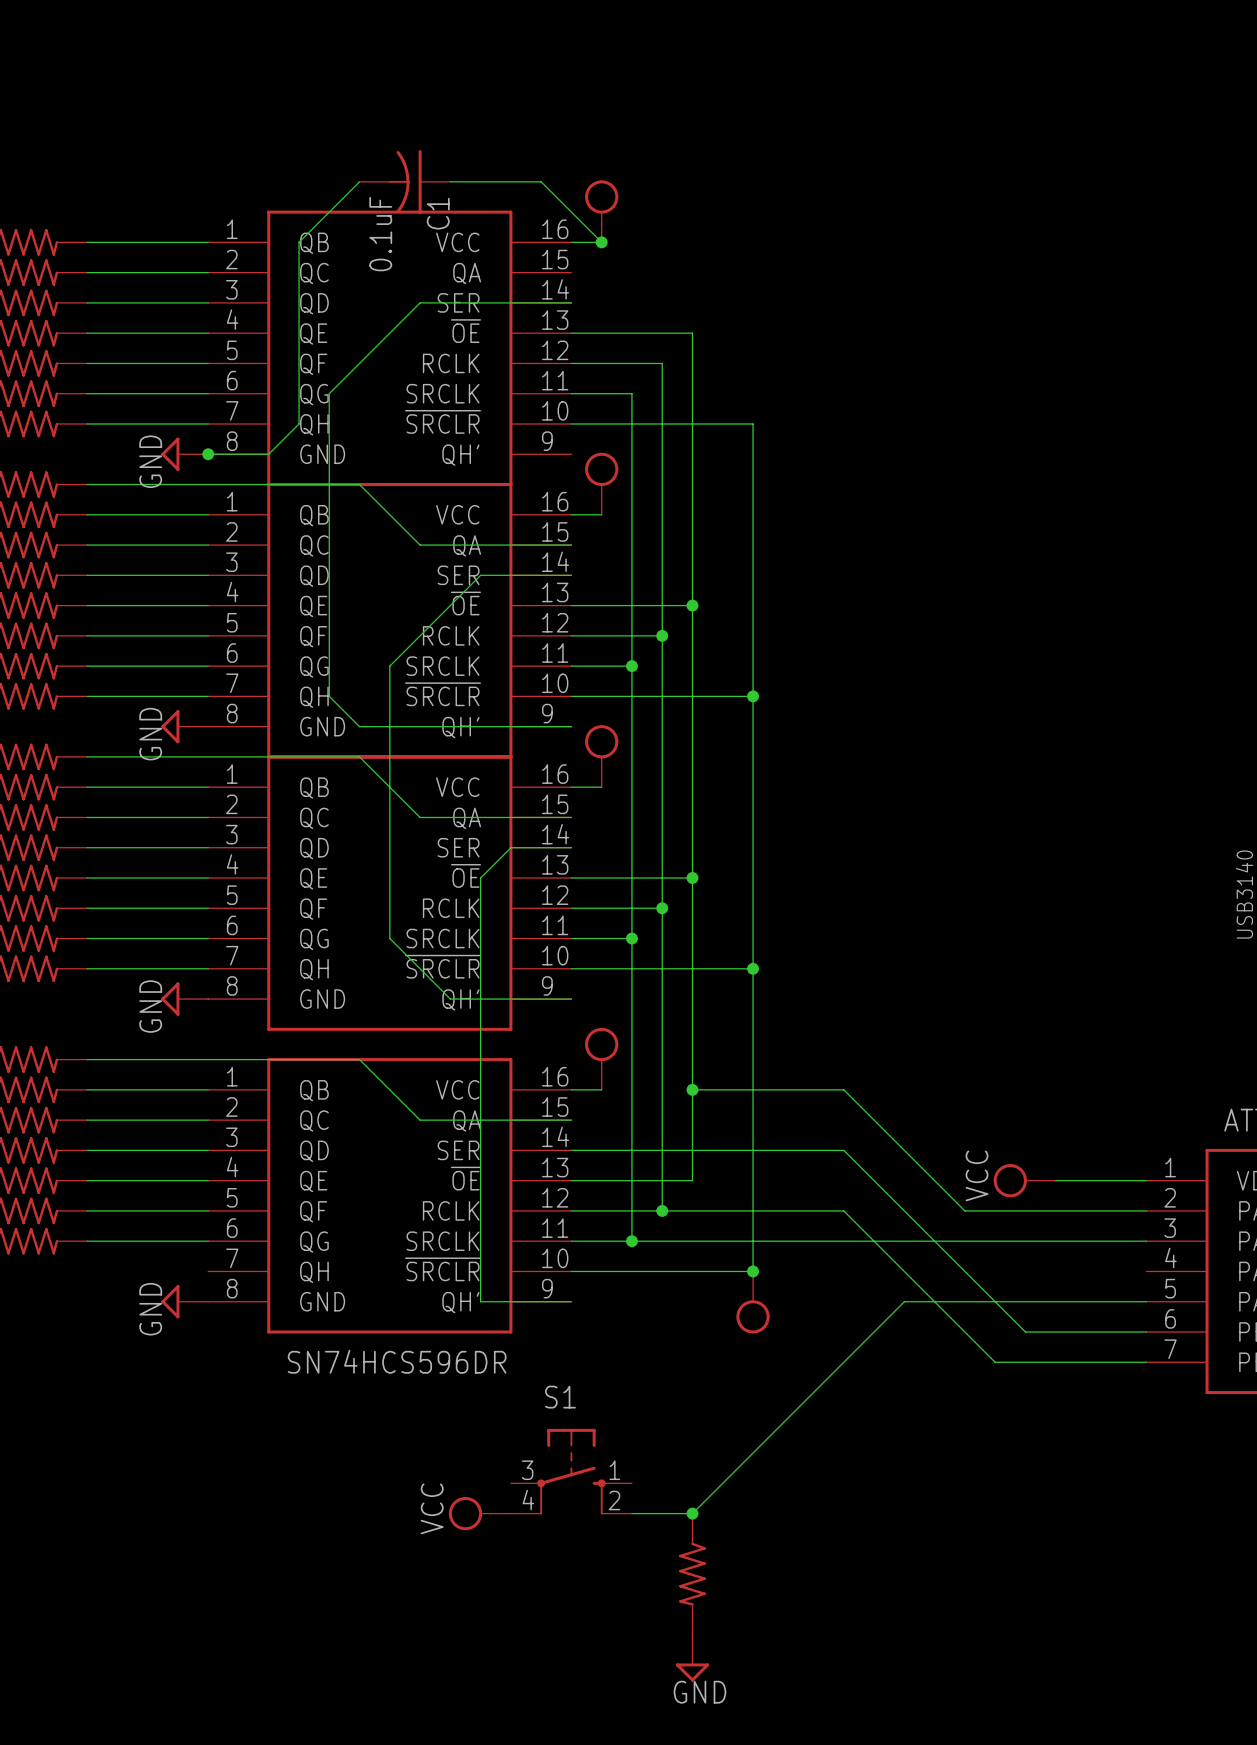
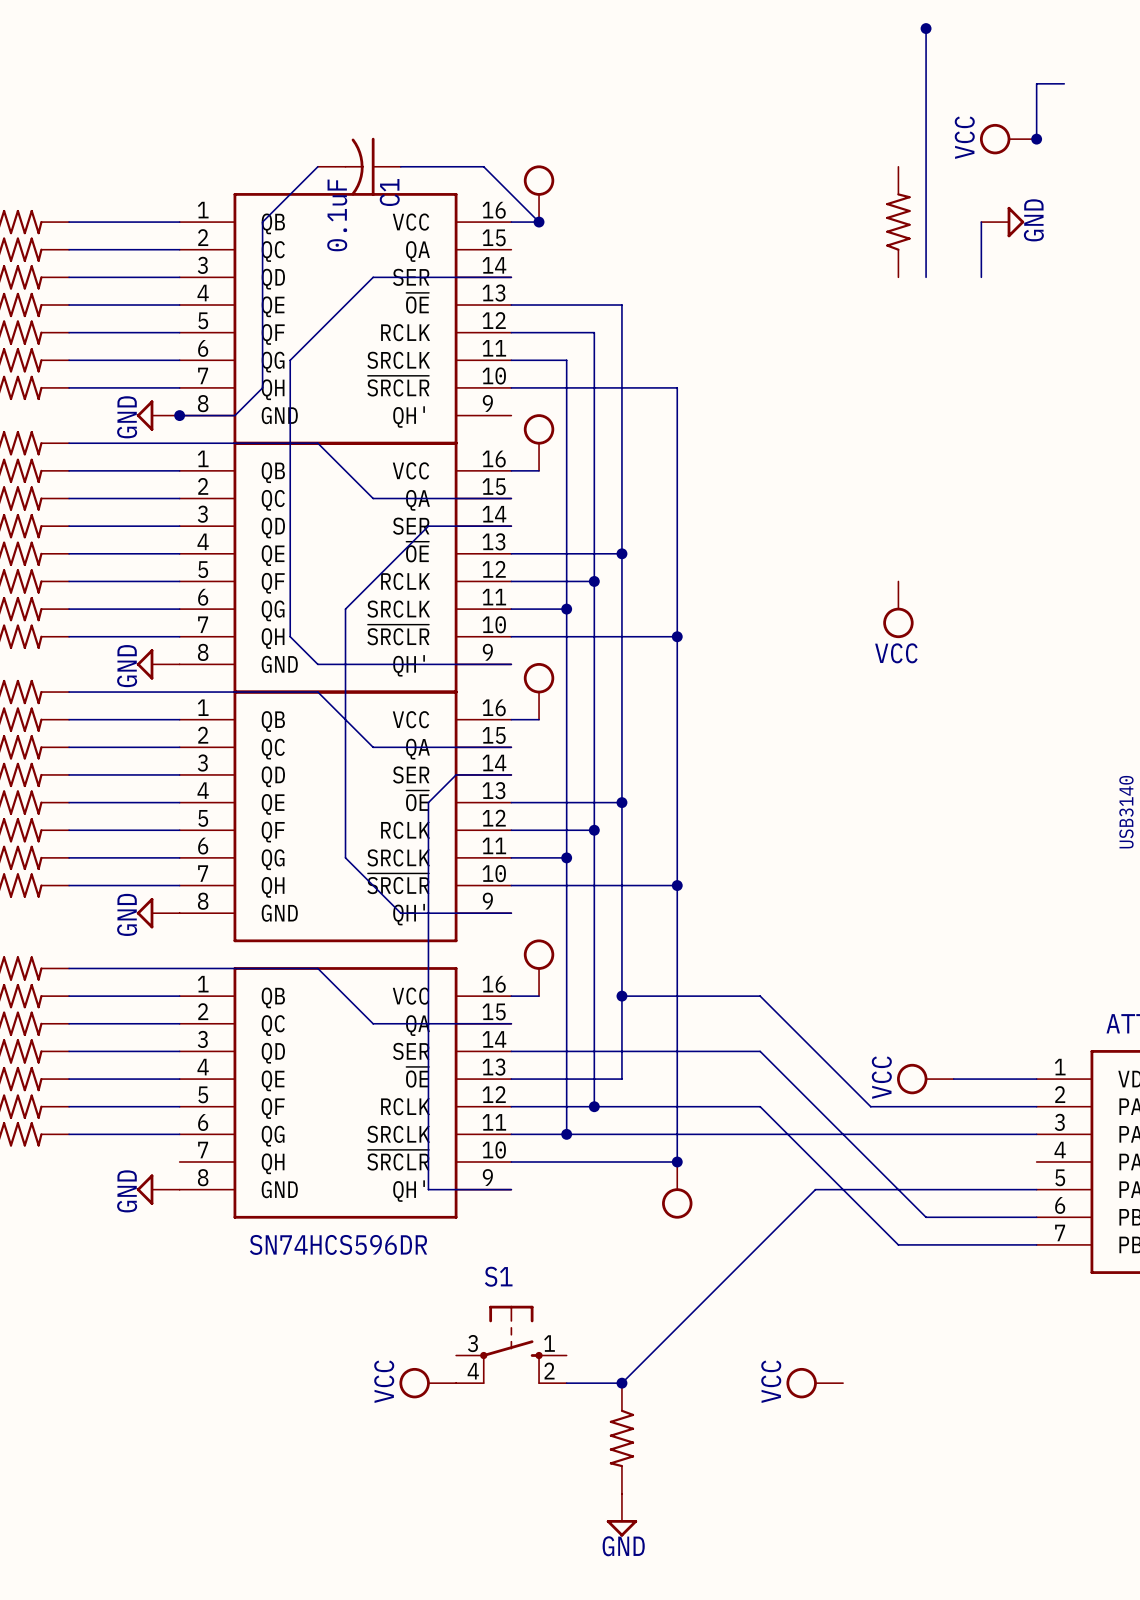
wire: none -> (926, 28) (926, 277)
junction: none -> (926, 28)
wire: none -> (1064, 83) (1036, 83) (1036, 139)
power symbol: none -> VCC (1008, 139)
junction: none -> (1036, 139)
part: none -> (898, 222)
wire: none -> (981, 222) (981, 277)
power symbol: none -> GND (1002, 222)
power symbol: none -> VCC (898, 609)
power symbol: none -> VCC (814, 1383)

